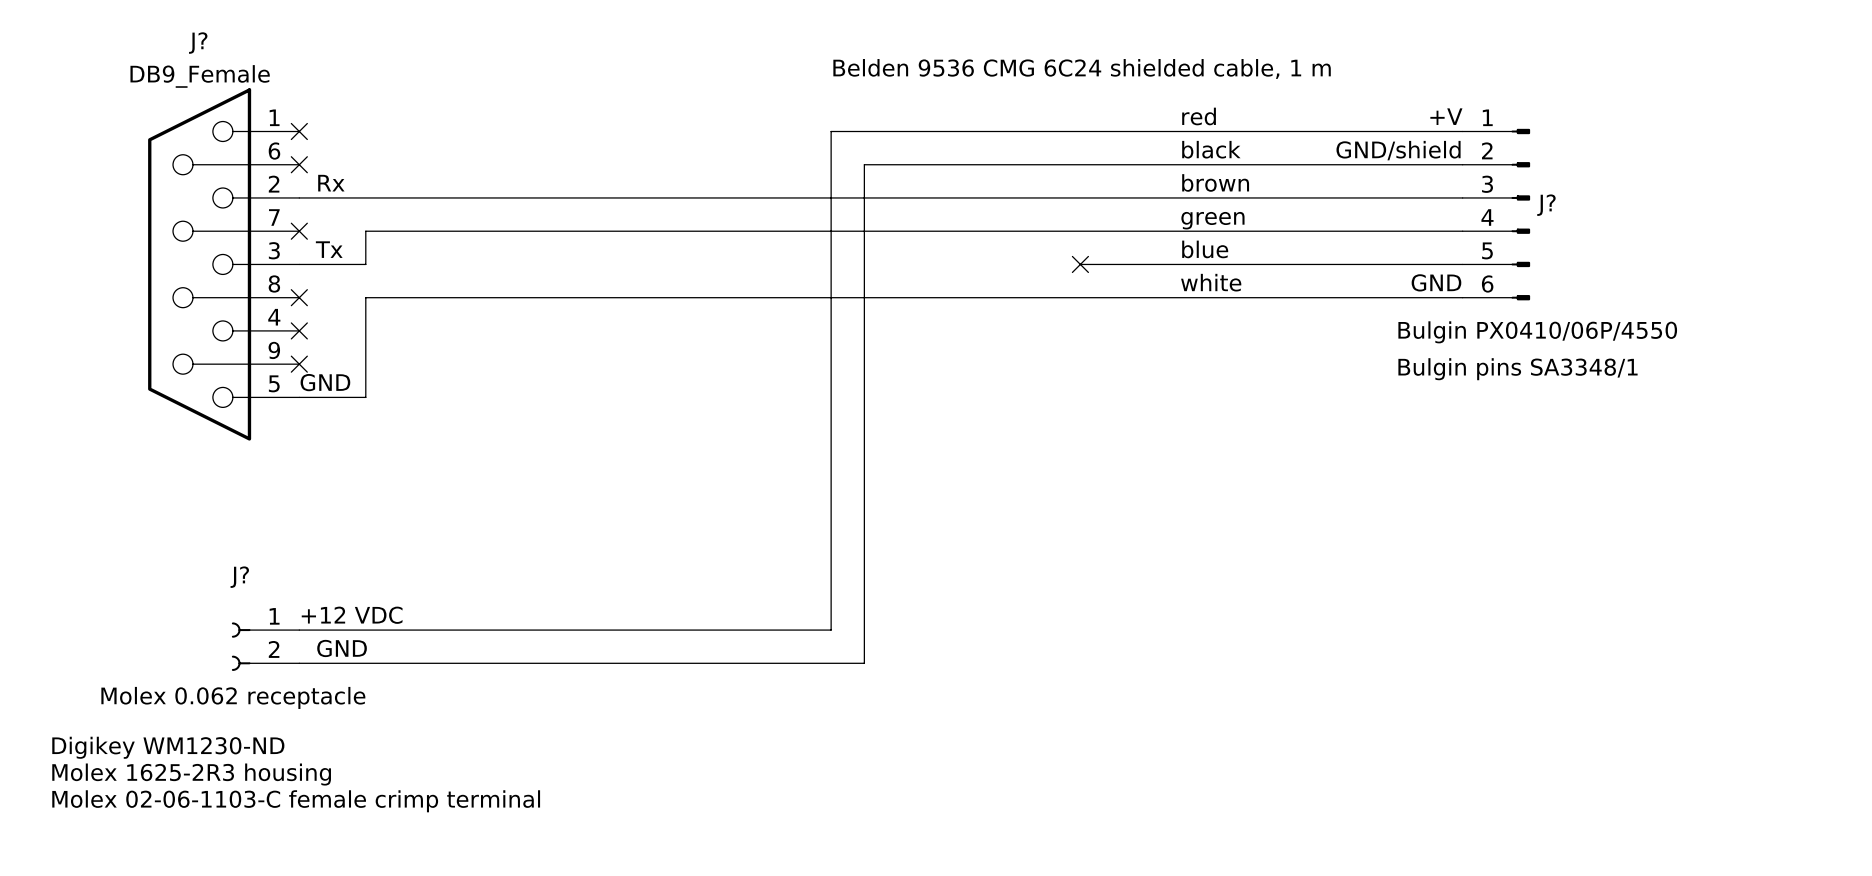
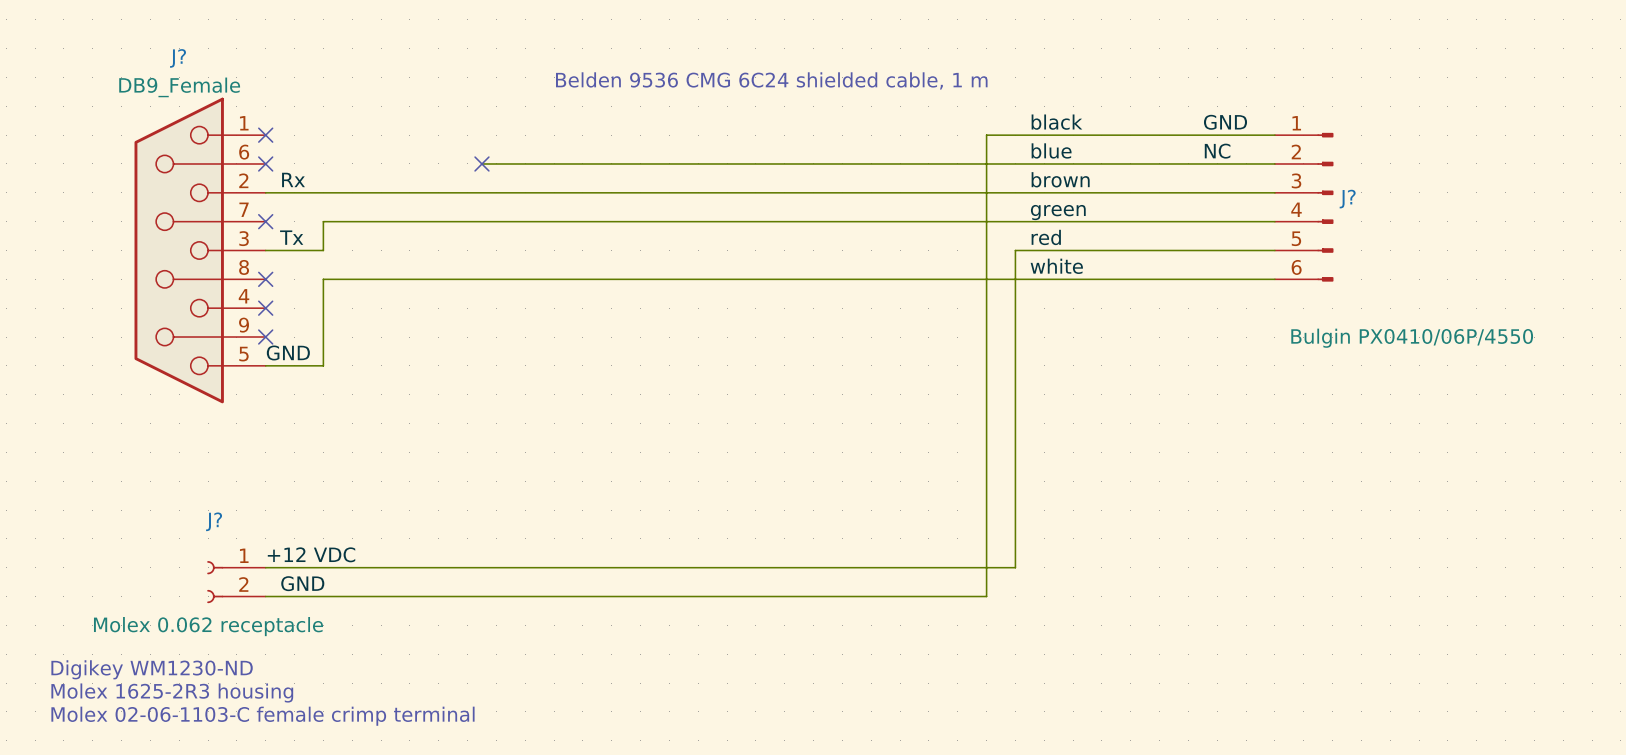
text position: Belden 9536 CMG 6C24 shielded cable, 1 m (1082, 69) -> Belden 9536 CMG 6C24 shielded cable, 1 m (771, 80)
label: red (1199, 116) -> black (1056, 122)
label: +V (1446, 116) -> none
wire: (1130, 131) (831, 131) (831, 630) -> (986, 135) (986, 596) (755, 596)
label: black (1211, 149) -> blue (1051, 150)
label: none -> NC (1217, 151)
label: GND/shield (1398, 150) -> none
no-connect mark: none -> (481, 163)
wire: (864, 164) (864, 663) -> (755, 163) (481, 163)
label: blue (1205, 249) -> red (1046, 237)
wire: (1080, 264) (1163, 264) -> (727, 567) (1015, 567) (1015, 250)
no-connect mark: (1080, 264) -> none
label position: GND (1436, 282) -> GND (1225, 122)
J? value position: Bulgin PX0410/06P/4550 (1537, 332) -> Bulgin PX0410/06P/4550 (1412, 338)
text: Bulgin pins SA3348/1 (1518, 369) -> none

